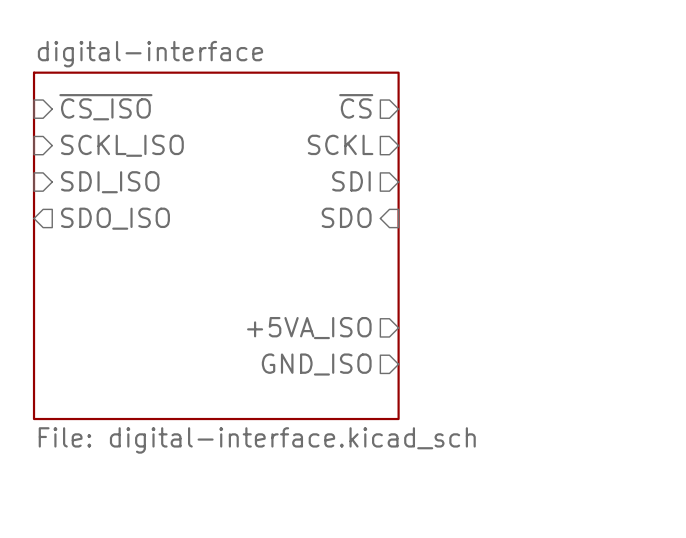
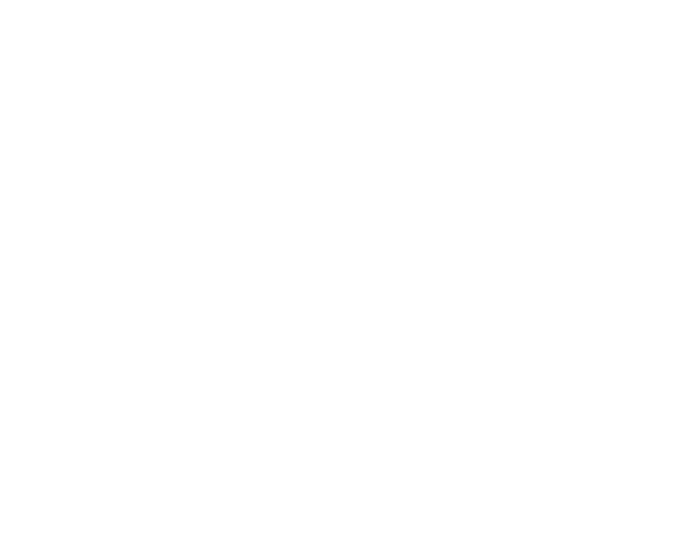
sheet pin: ~{CS} (356, 106) -> none
sheet pin: ~{CS_ISO} (105, 107) -> none
sheet pin: SCKL (340, 144) -> none
sheet pin: SCKL_ISO (122, 145) -> none
sheet pin: SDI (351, 181) -> none
sheet pin: SDI_ISO (110, 182) -> none
sheet pin: SDO (346, 217) -> none
sheet pin: SDO_ISO (115, 218) -> none
sheet digital-interface: File: digital-interface.kicad_sch (216, 245) -> none
sheet pin: +5VA_ISO (309, 328) -> none
sheet pin: GND_ISO (316, 364) -> none

